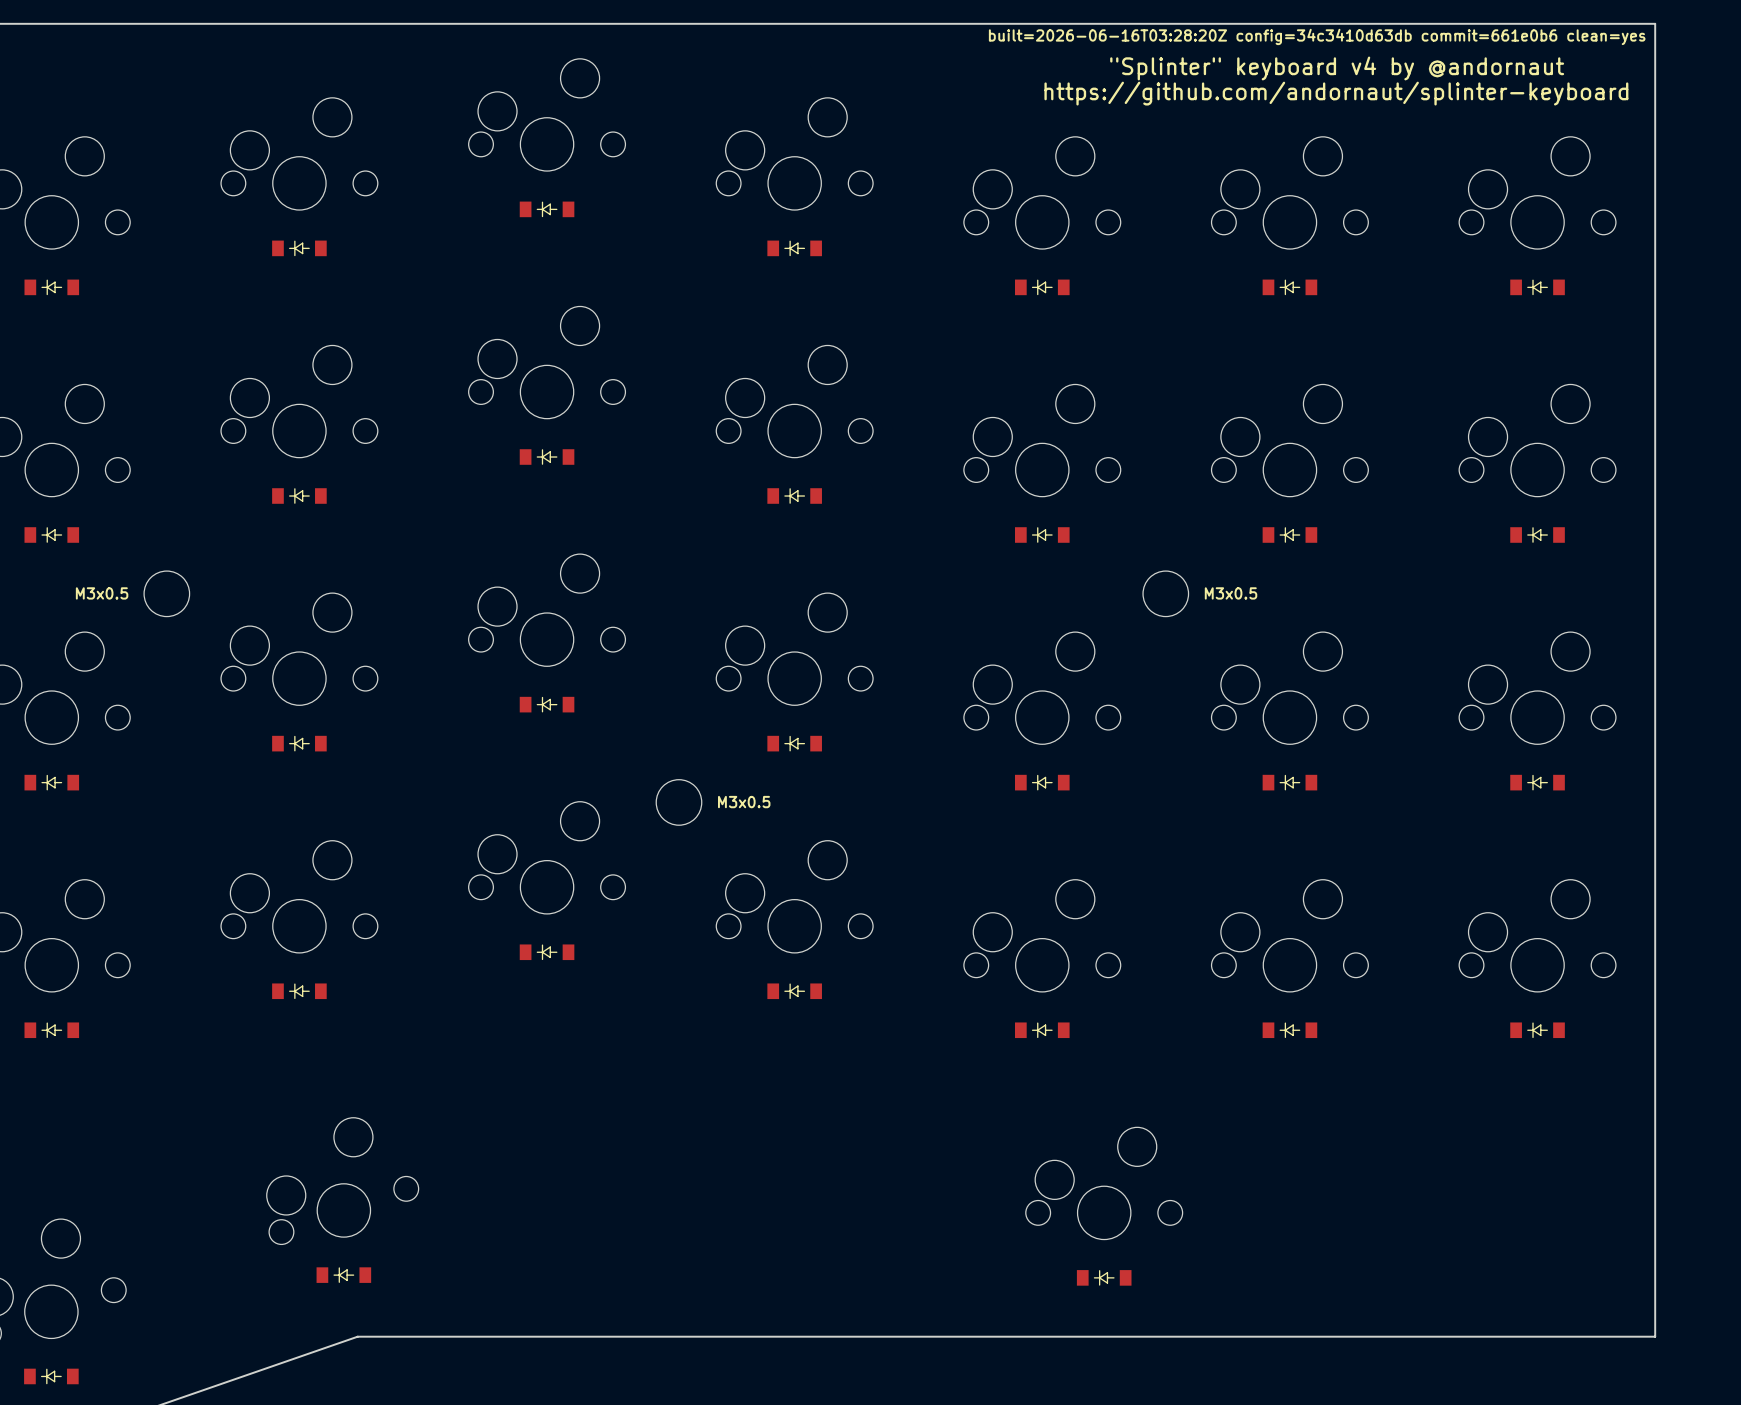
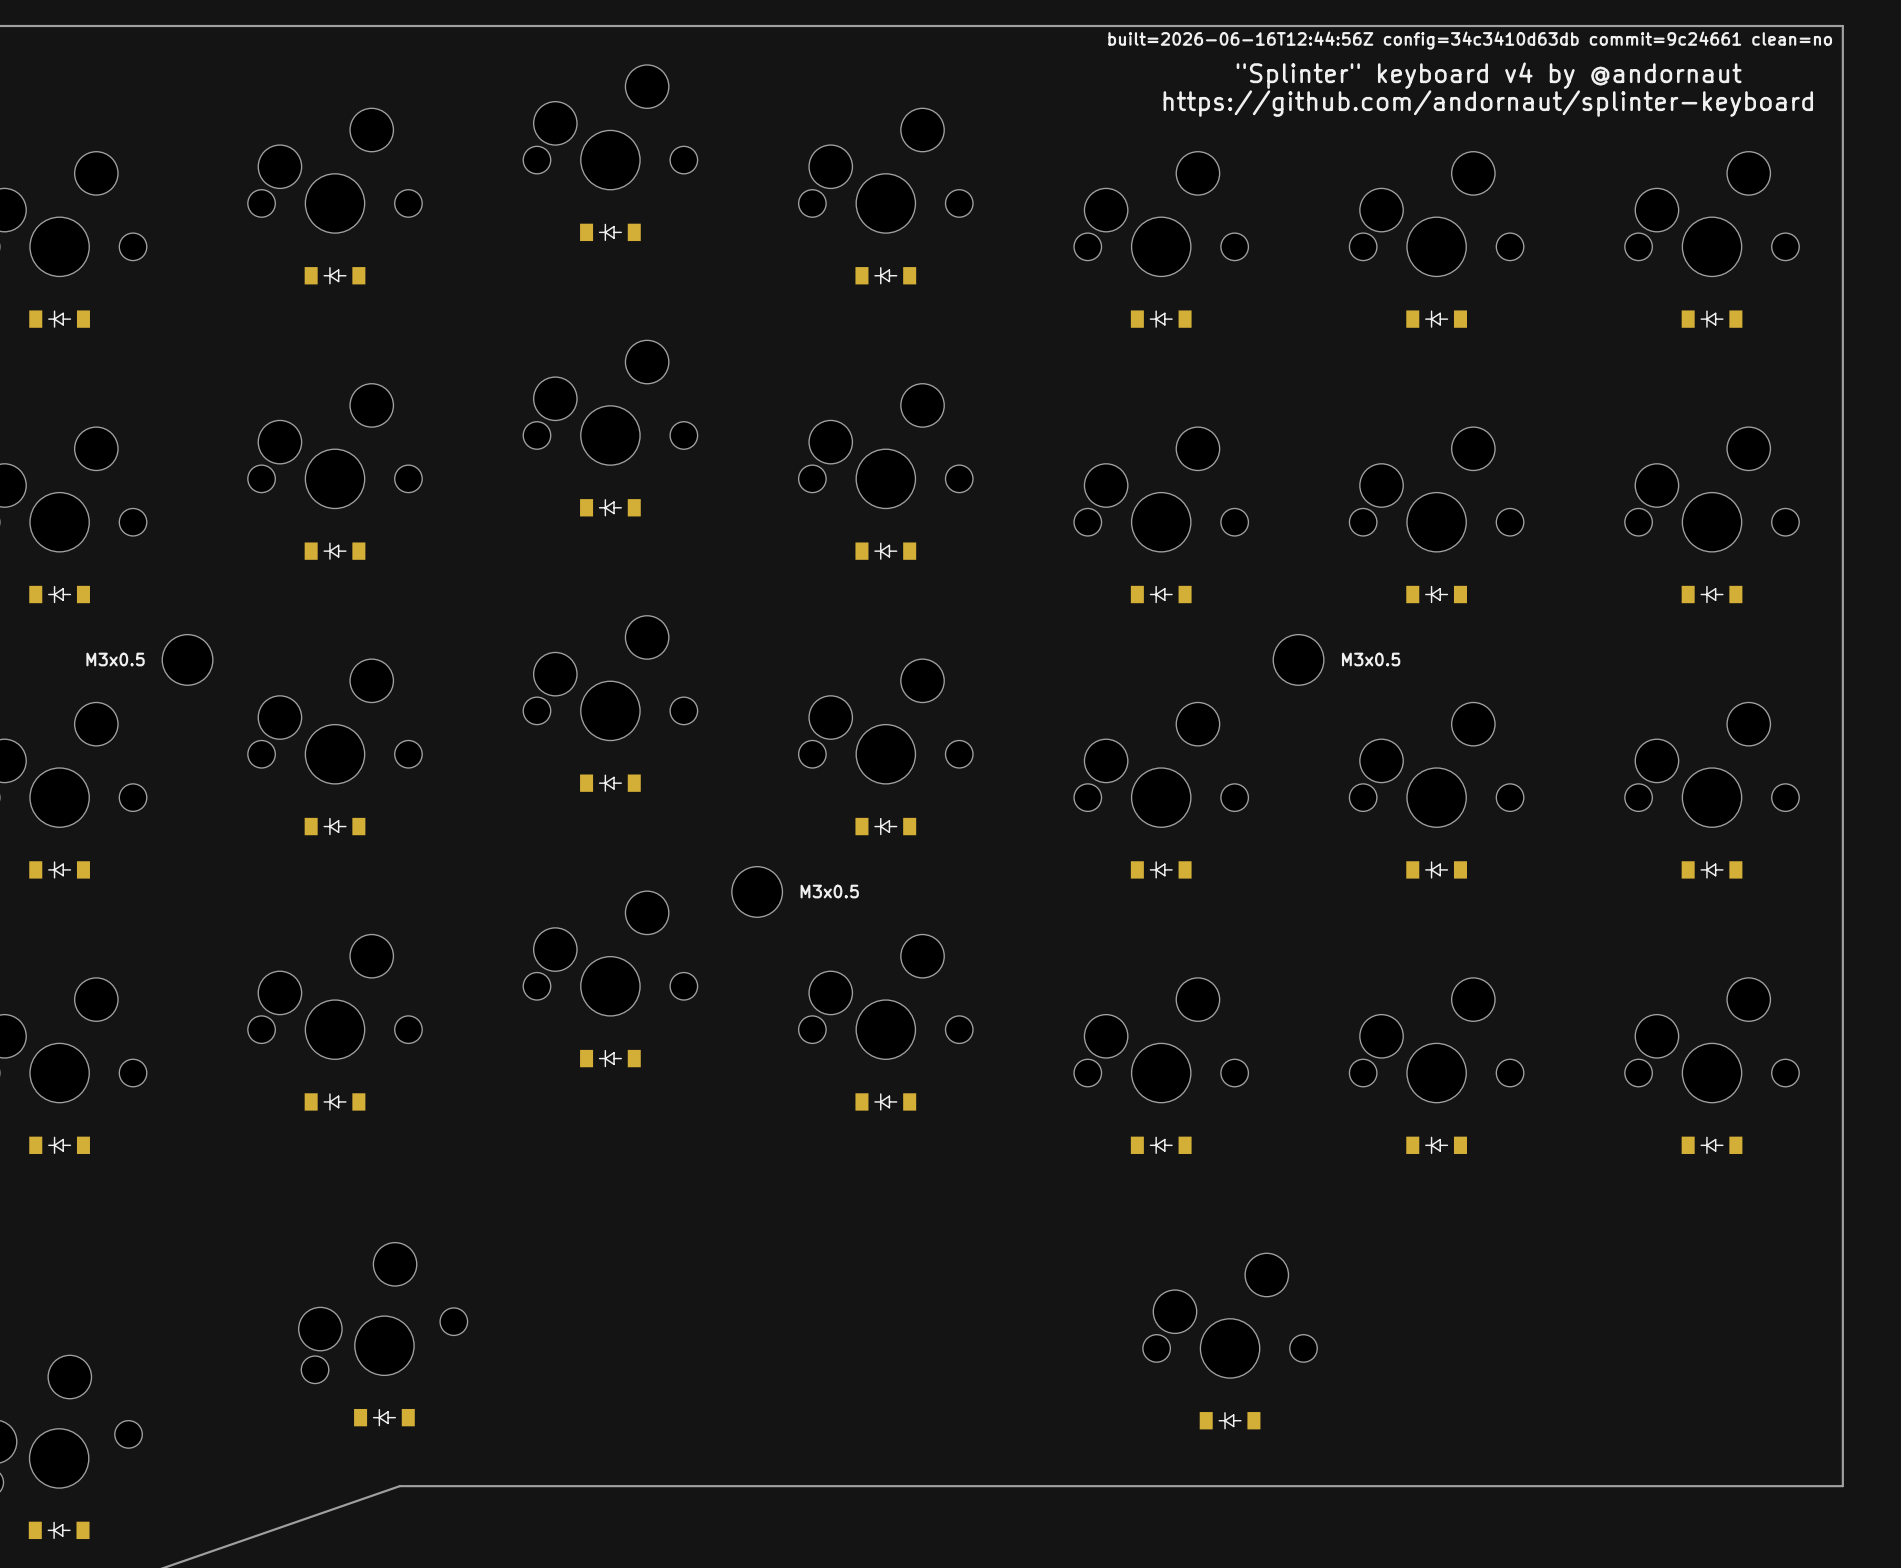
text: built=2026-06-16T03:28:20Z config=34c3410d63db commit=661e0b6 clean=yes (1317, 36) -> built=2026-06-16T12:44:56Z config=34c3410d63db commit=9c24661 clean=no (1470, 40)

